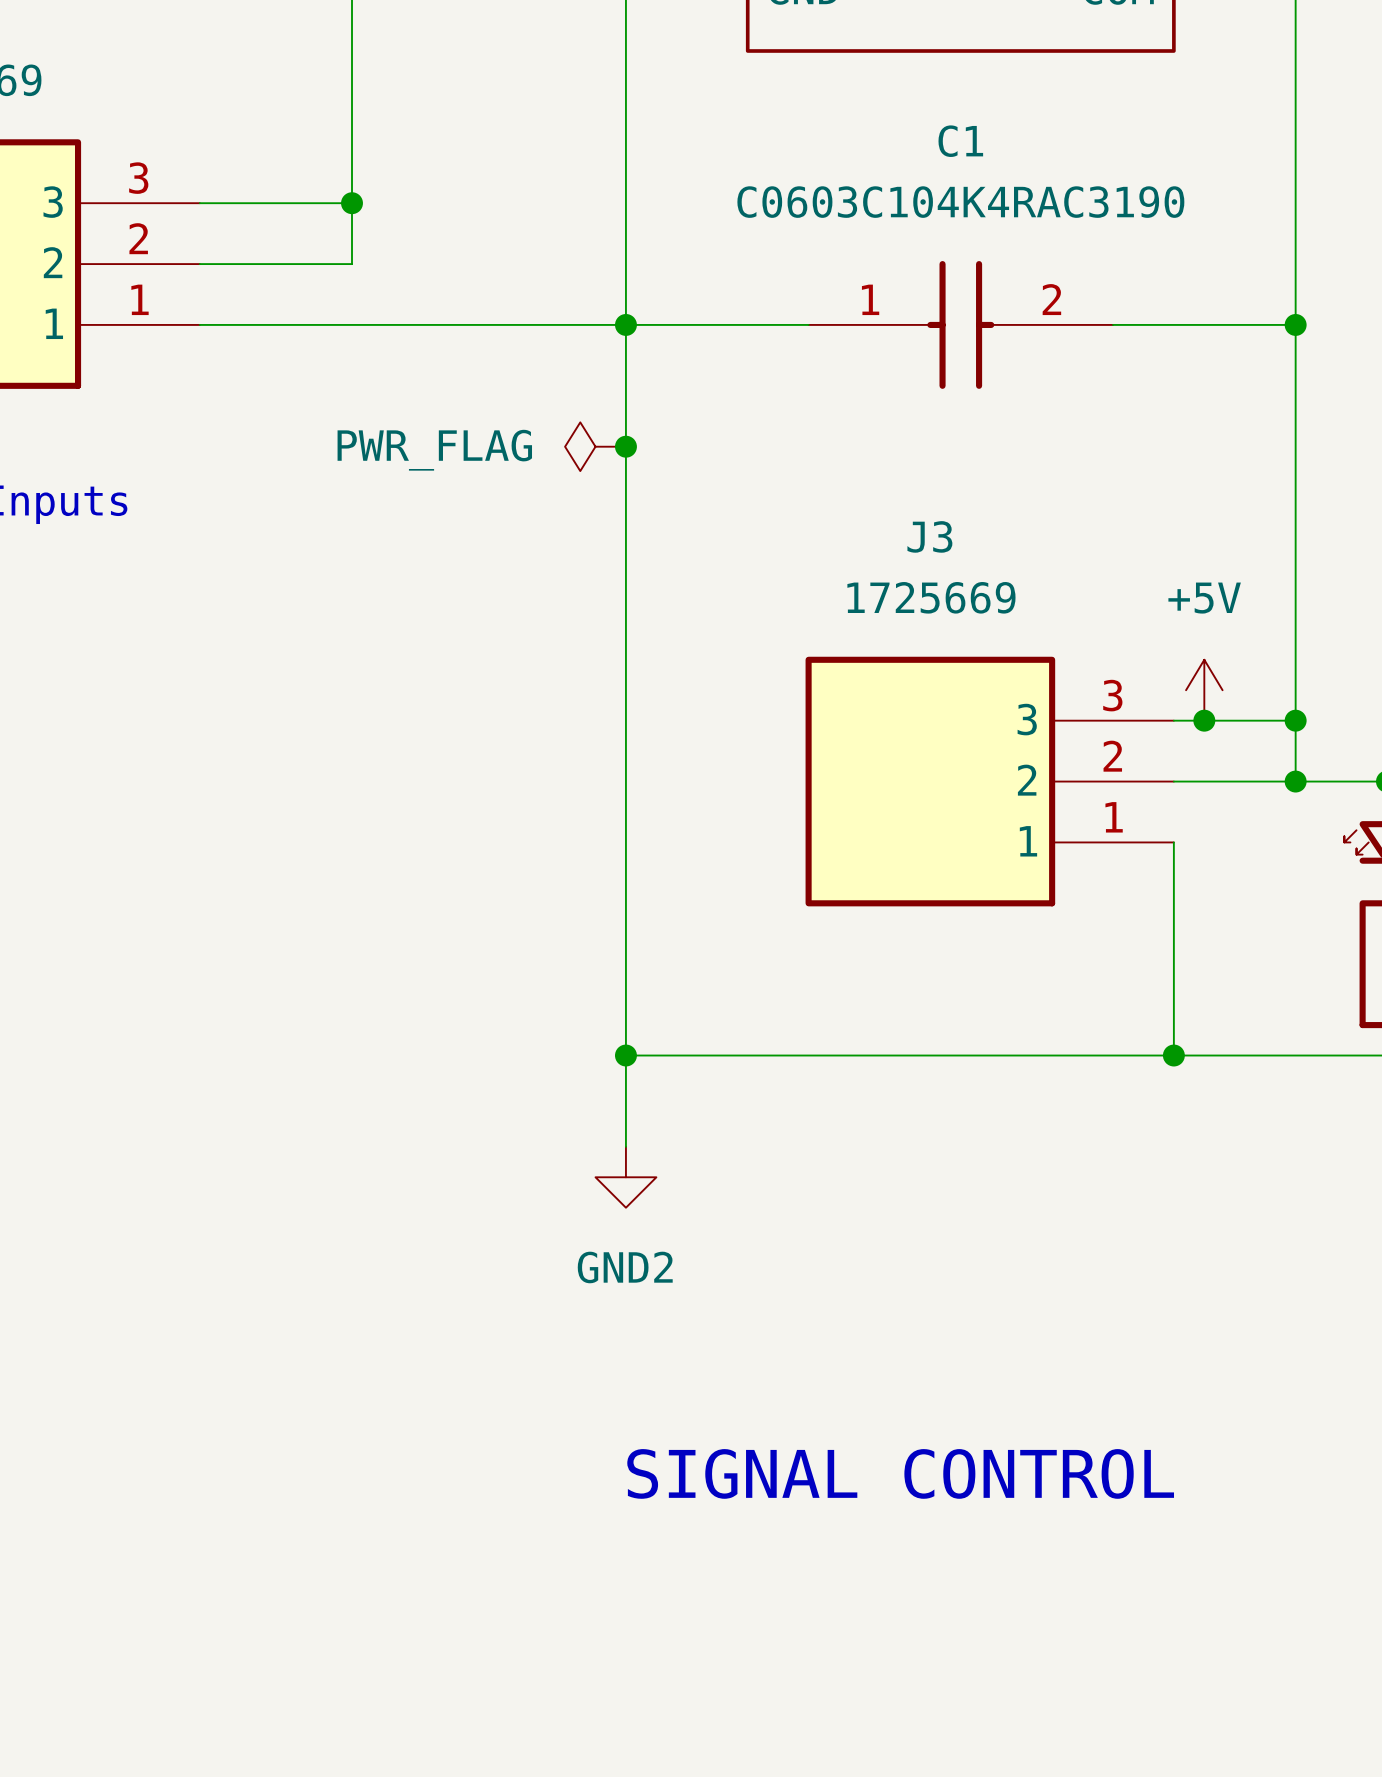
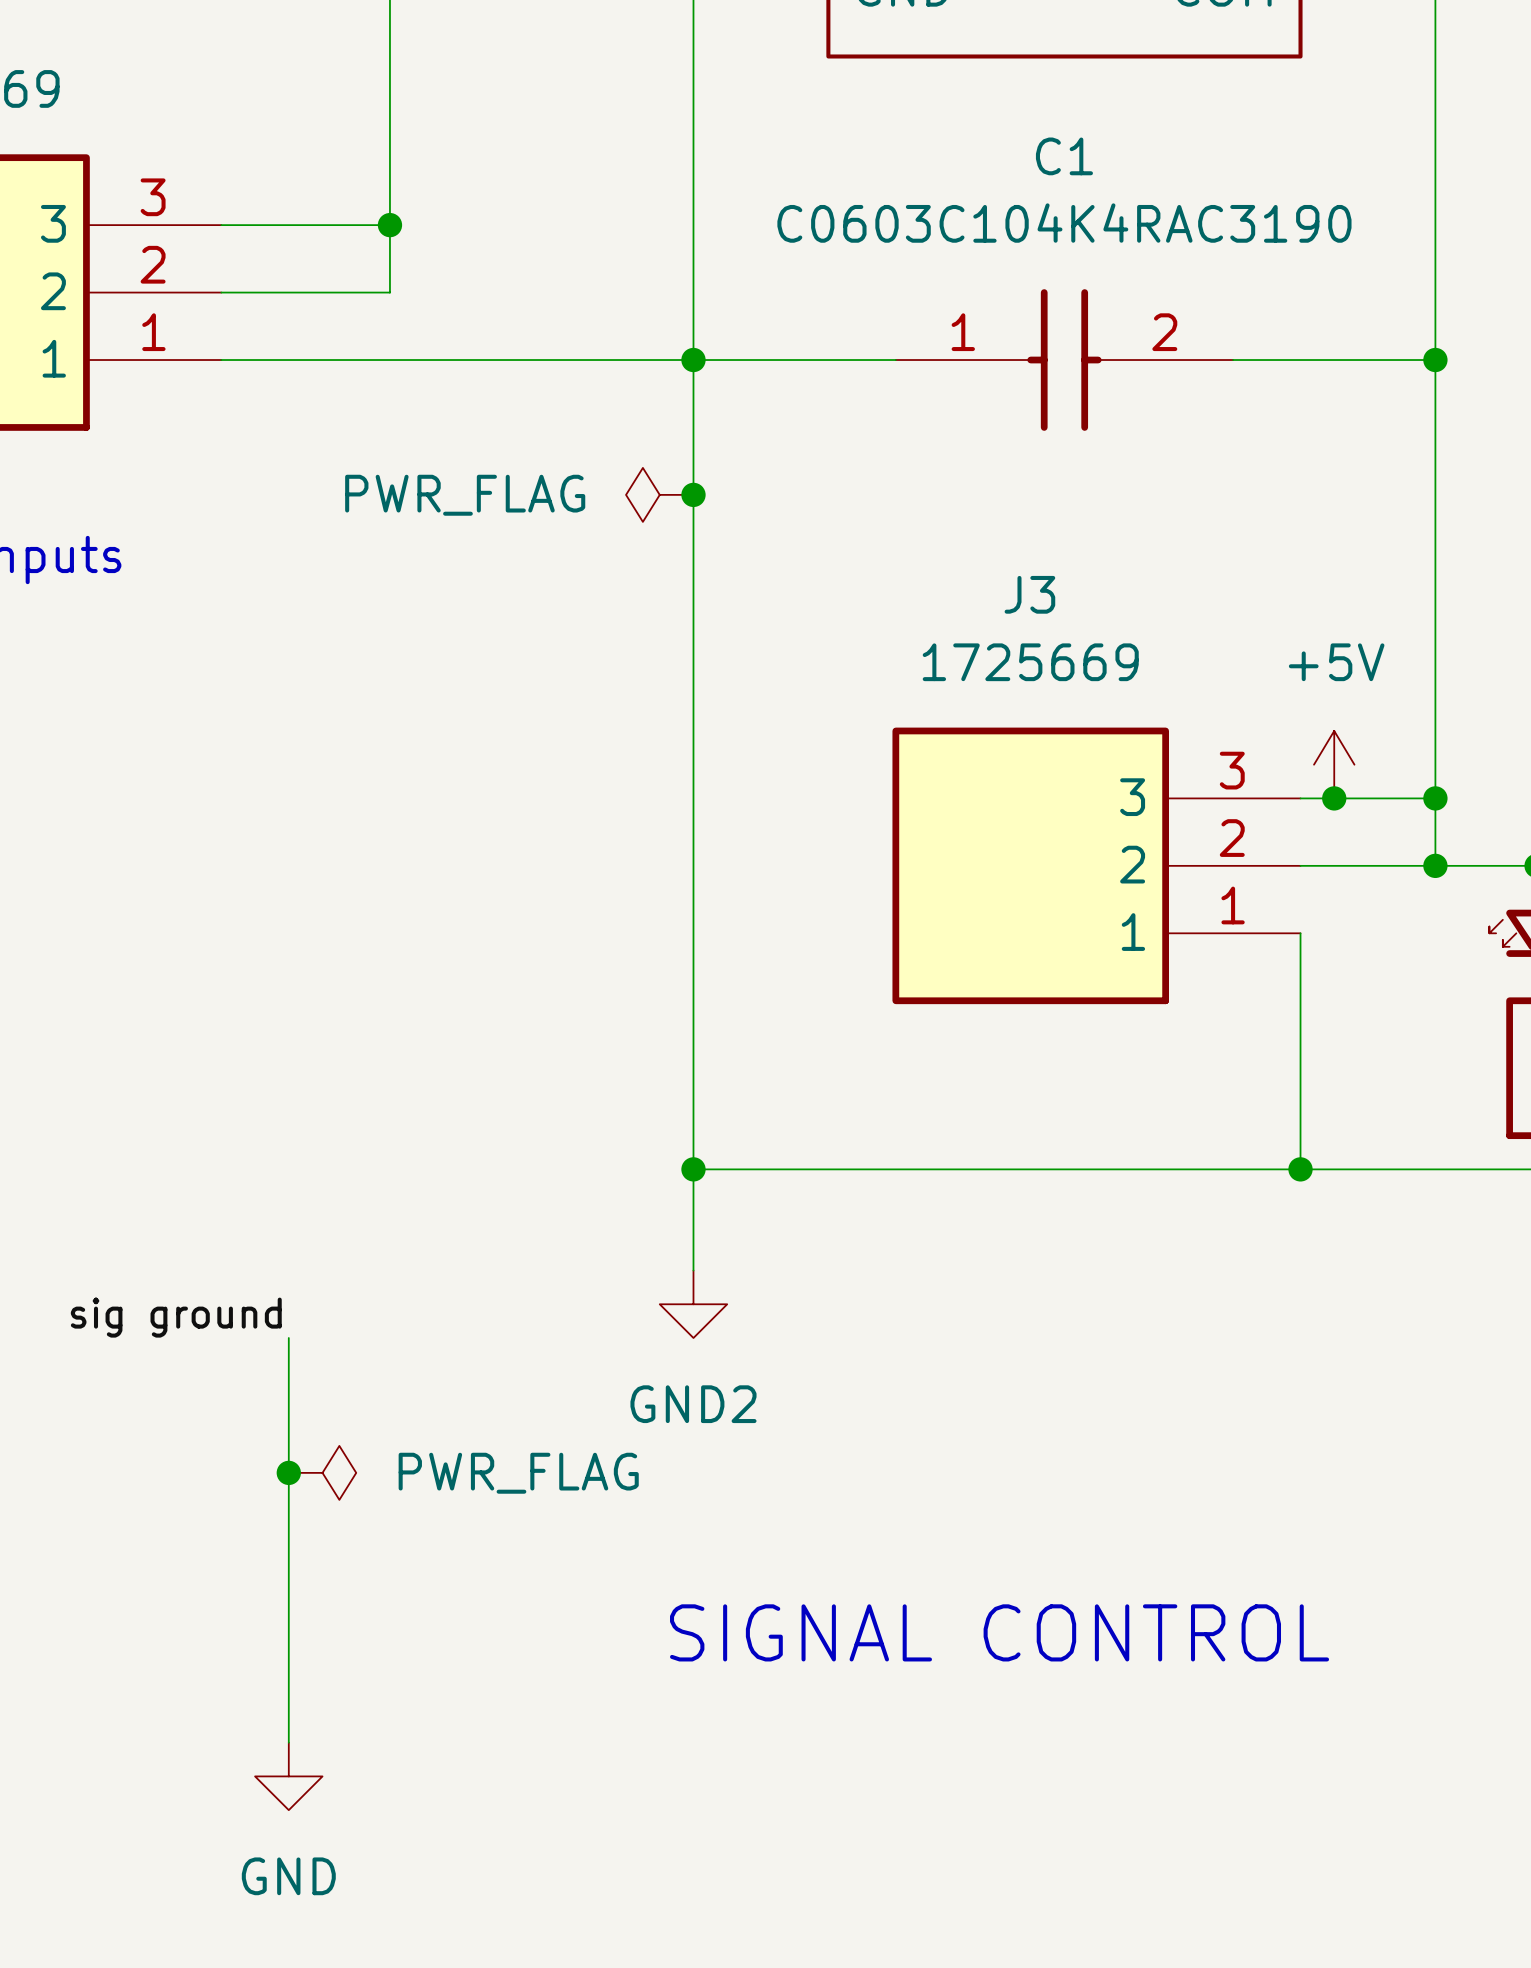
label: none -> sig ground (176, 1317)
wire: none -> (288, 1338) (288, 1742)
junction: none -> (288, 1472)
power symbol: none -> PWR_FLAG (322, 1472)
power symbol: none -> GND (288, 1776)

